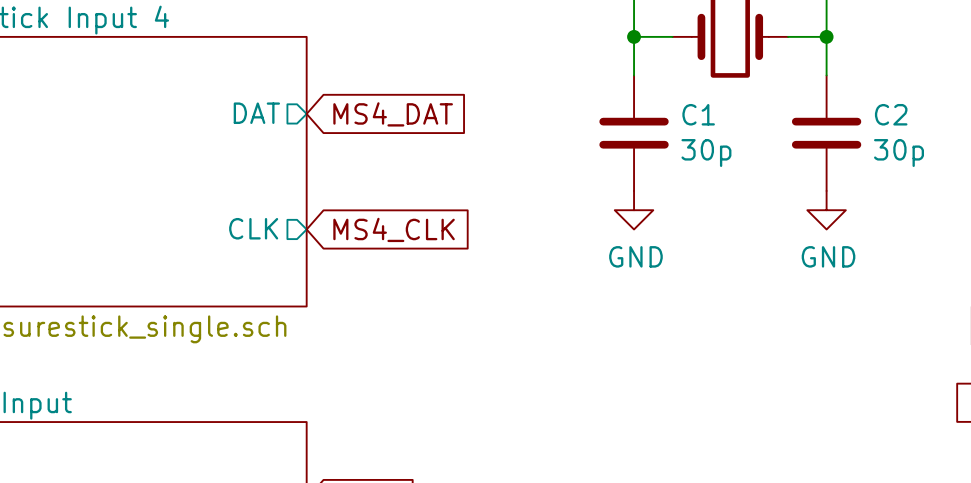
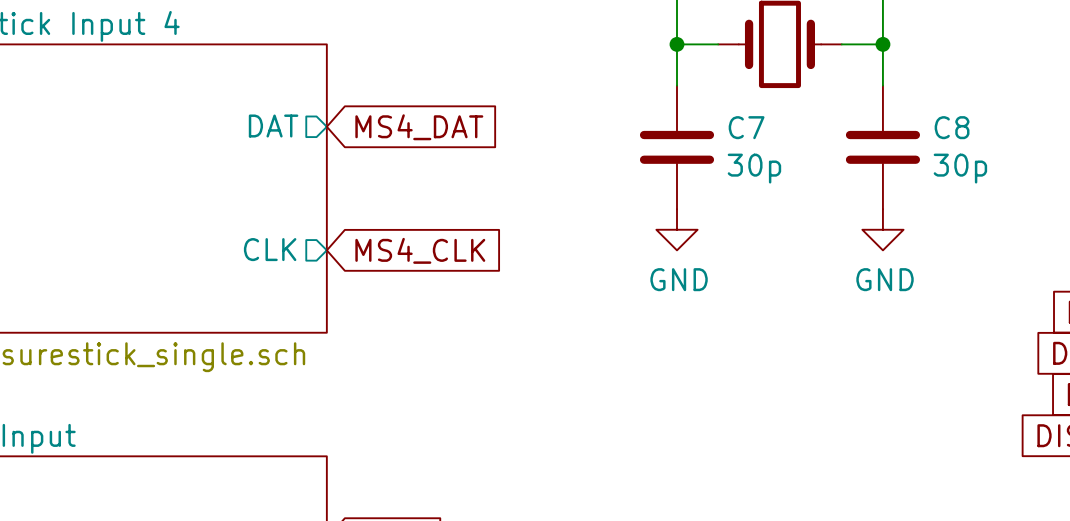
C1 name: C1 (698, 114) -> C7 (746, 127)
C2 name: C2 (891, 114) -> C8 (952, 127)

